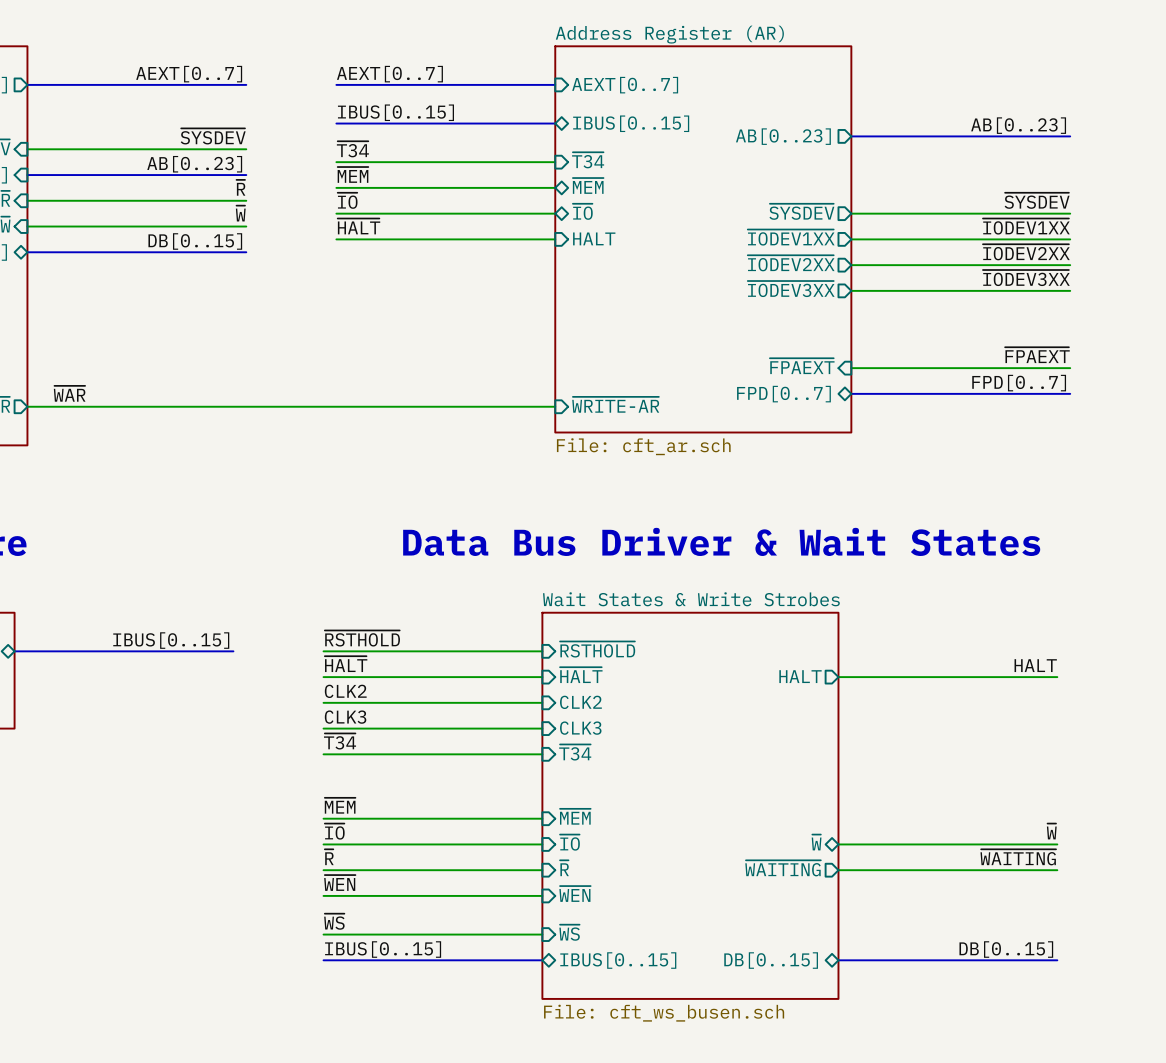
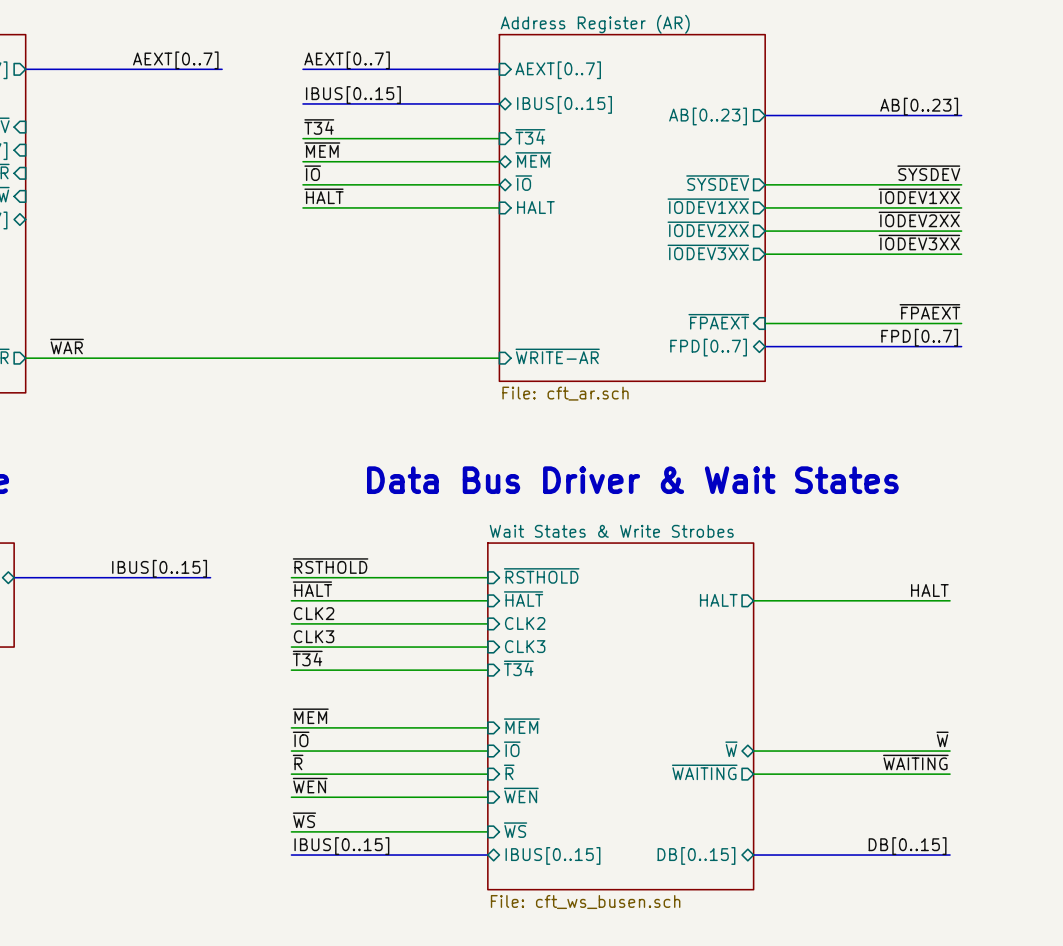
label: ~{SYSDEV} (213, 136) -> none
wire: (27, 149) (246, 149) -> none
label: AB[0..23] (194, 164) -> none
bus: (27, 175) (246, 175) -> none
label: ~{R} (240, 187) -> none
wire: (27, 200) (246, 200) -> none
label: ~{W} (240, 213) -> none
wire: (27, 226) (246, 226) -> none
label: DB[0..15] (195, 241) -> none
bus: (27, 252) (246, 252) -> none

